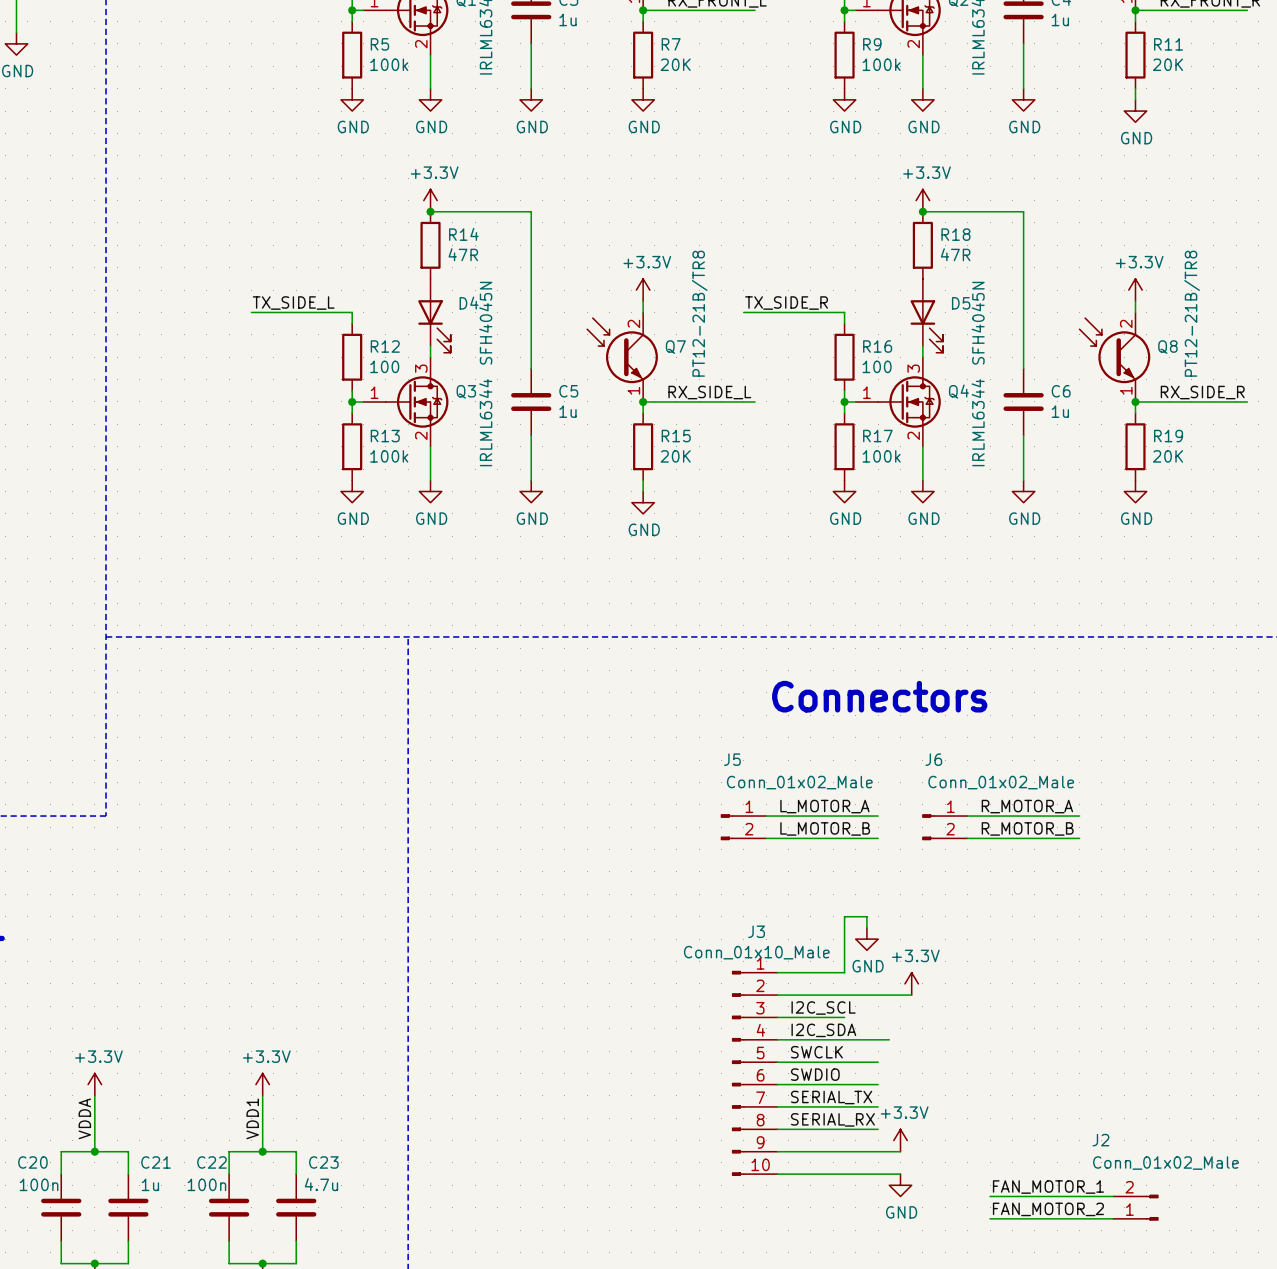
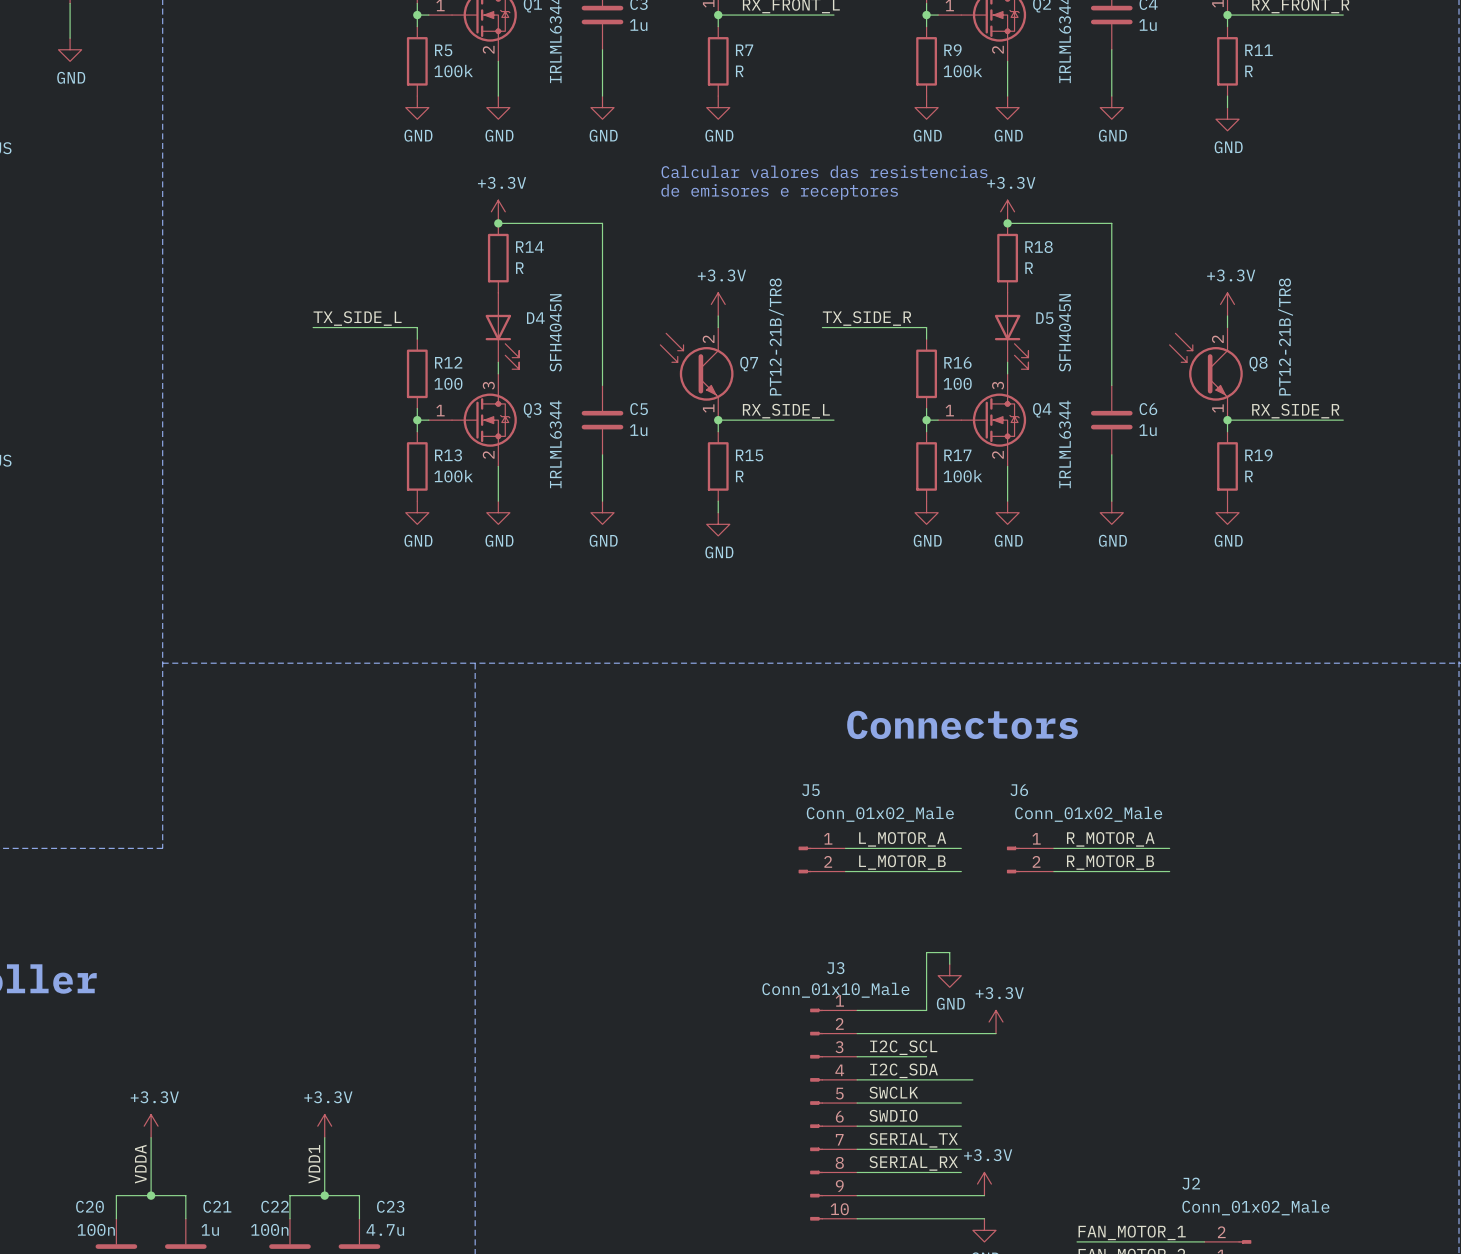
R7 value: 20K (675, 64) -> R (739, 71)
R11 value: 20K (1168, 64) -> R (1249, 71)
text: none -> Calcular valores das resistencias (824, 171)
text: none -> de emisores e receptores (779, 191)
R14 value: 47R (463, 254) -> R (519, 268)
R18 value: 47R (955, 254) -> R (1029, 268)
R15 value: 20K (675, 456) -> R (739, 476)
R19 value: 20K (1168, 456) -> R (1249, 476)

